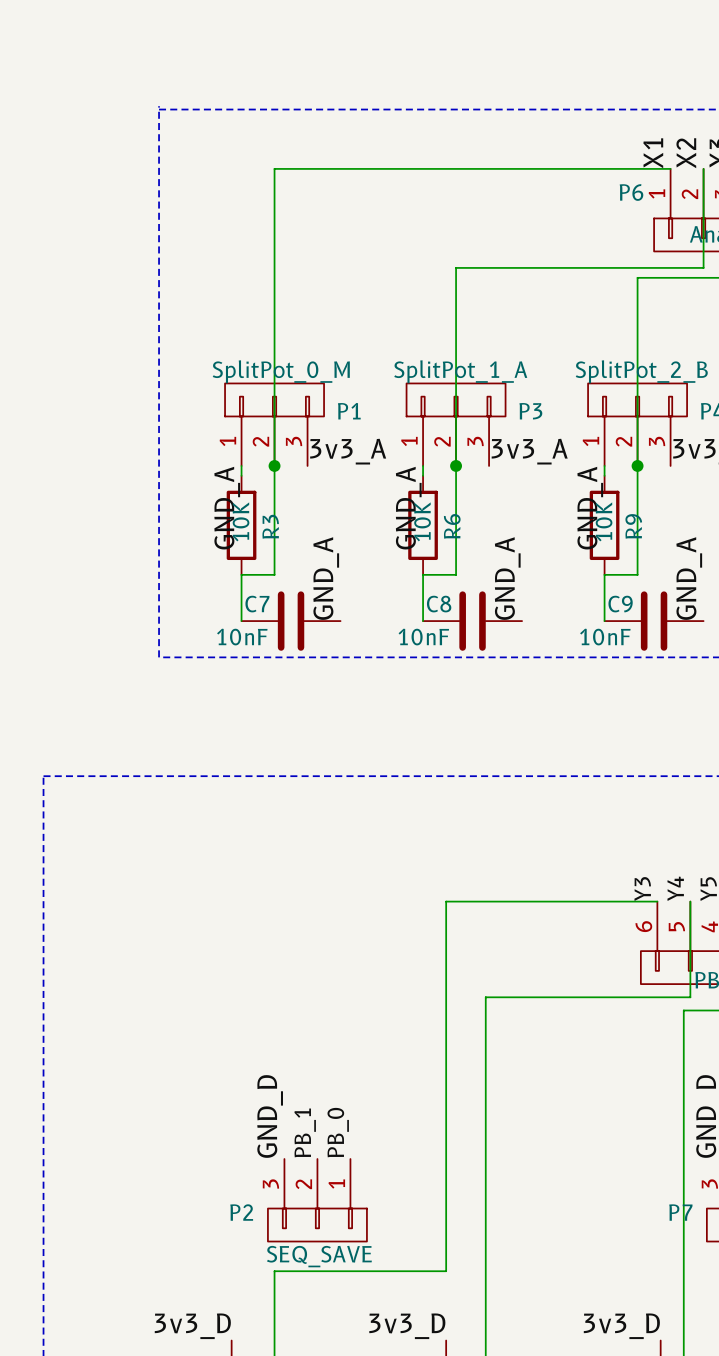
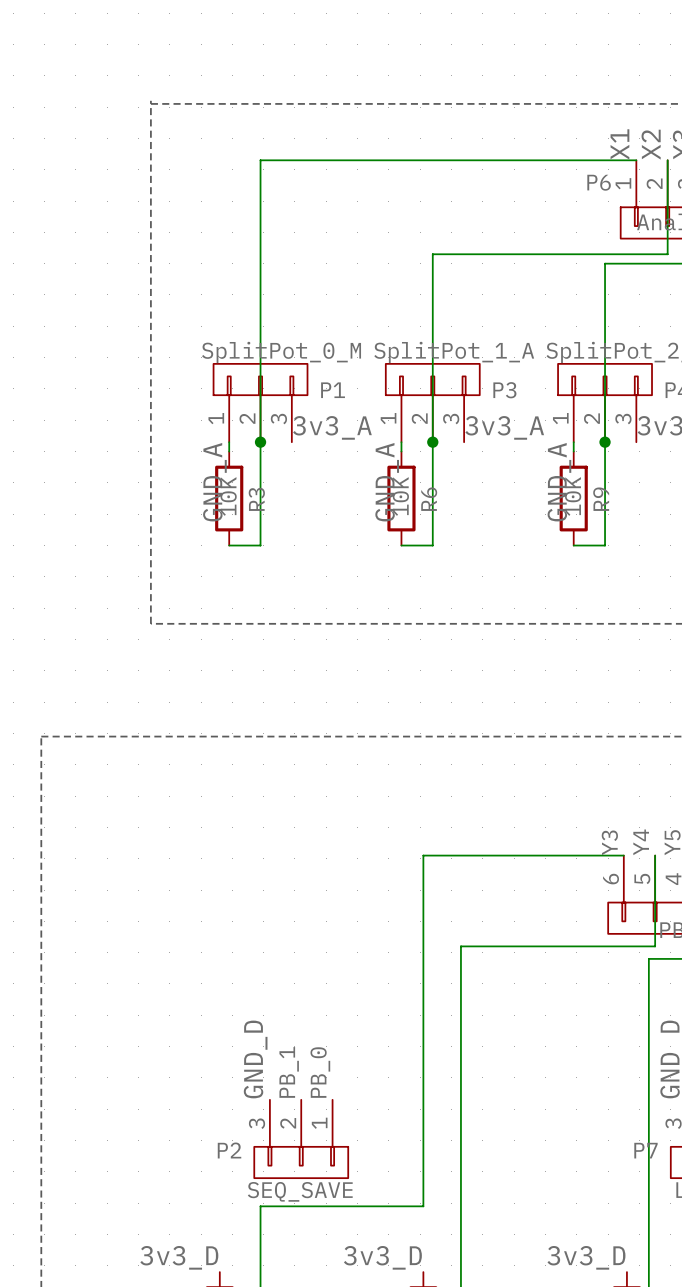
wire: (241, 574) (241, 621) -> none
wire: (423, 574) (423, 621) -> none
wire: (604, 574) (604, 621) -> none
label: GND_A (326, 578) -> none
label: GND_A (507, 578) -> none
label: GND_A (689, 578) -> none
C7: 10nF (291, 621) -> none
C8: 10nF (472, 621) -> none
C9: 10nF (654, 621) -> none

